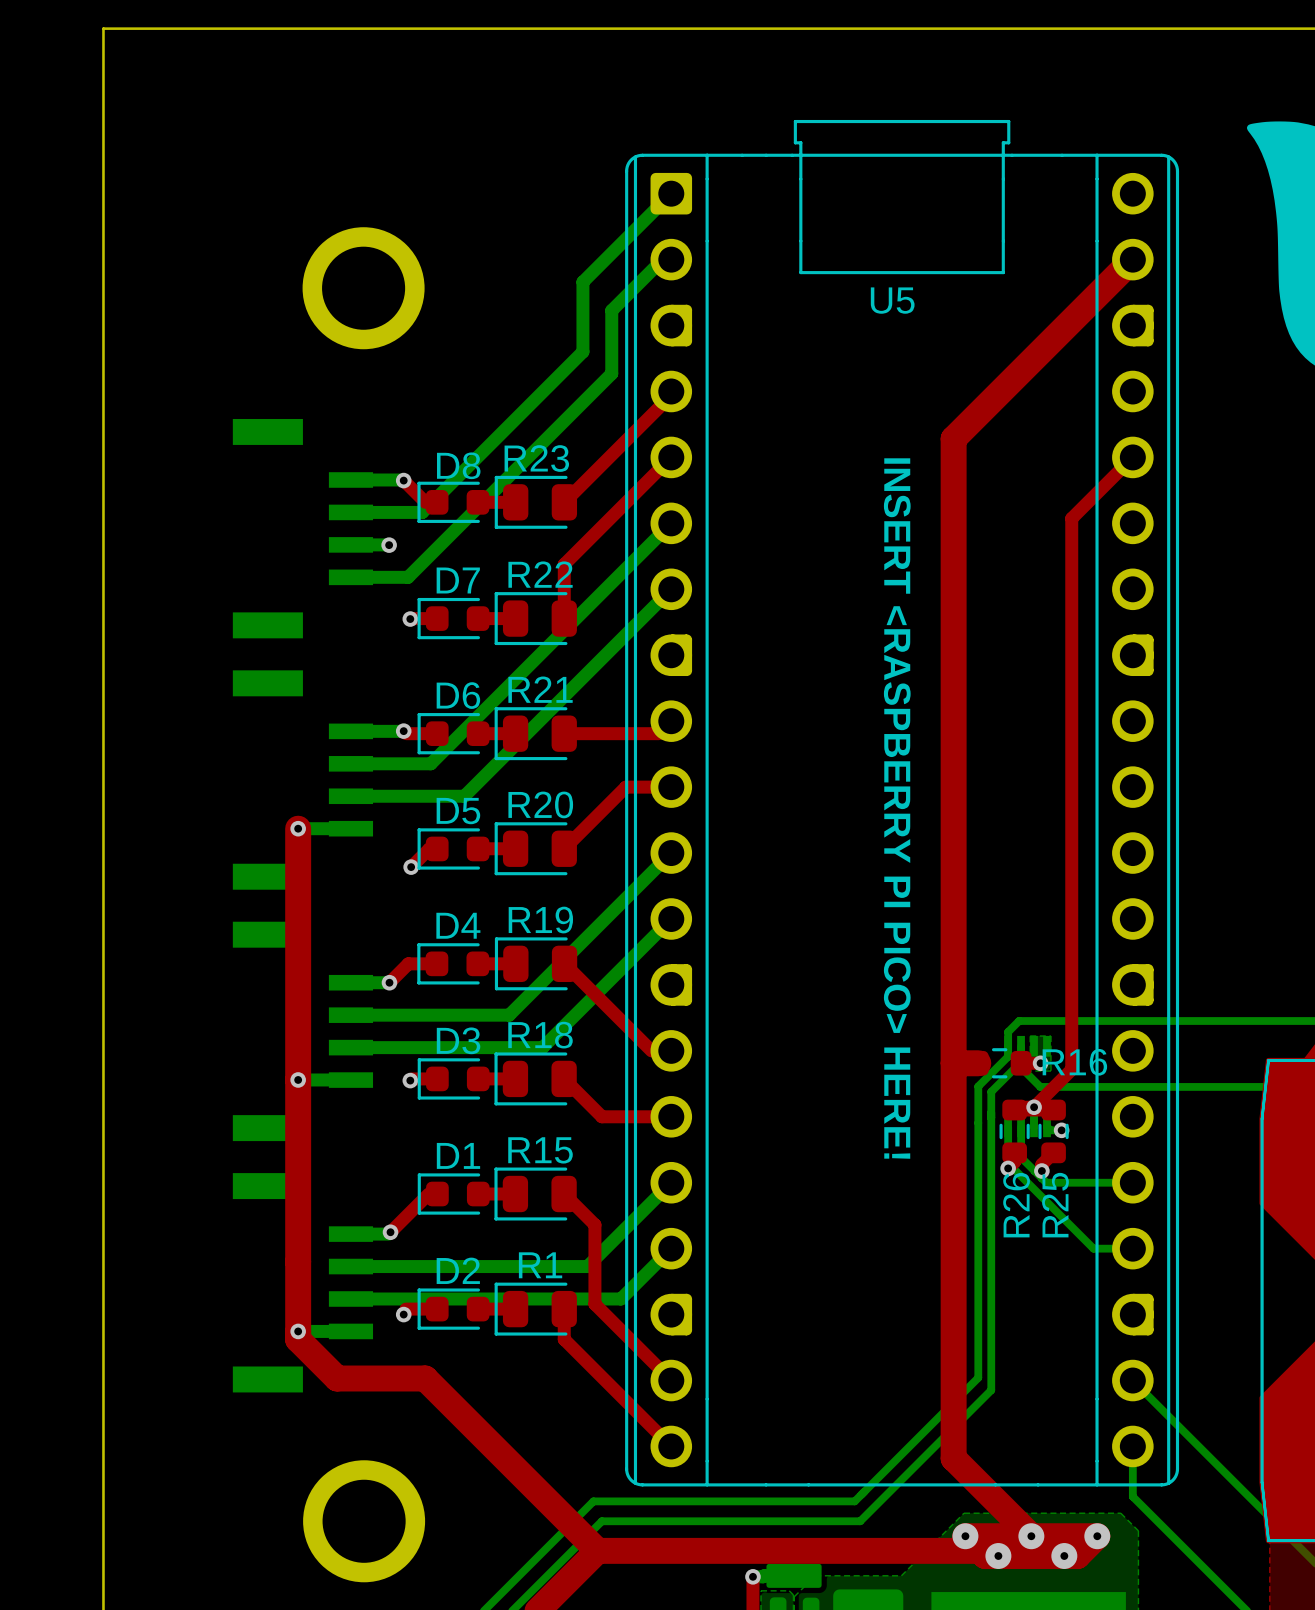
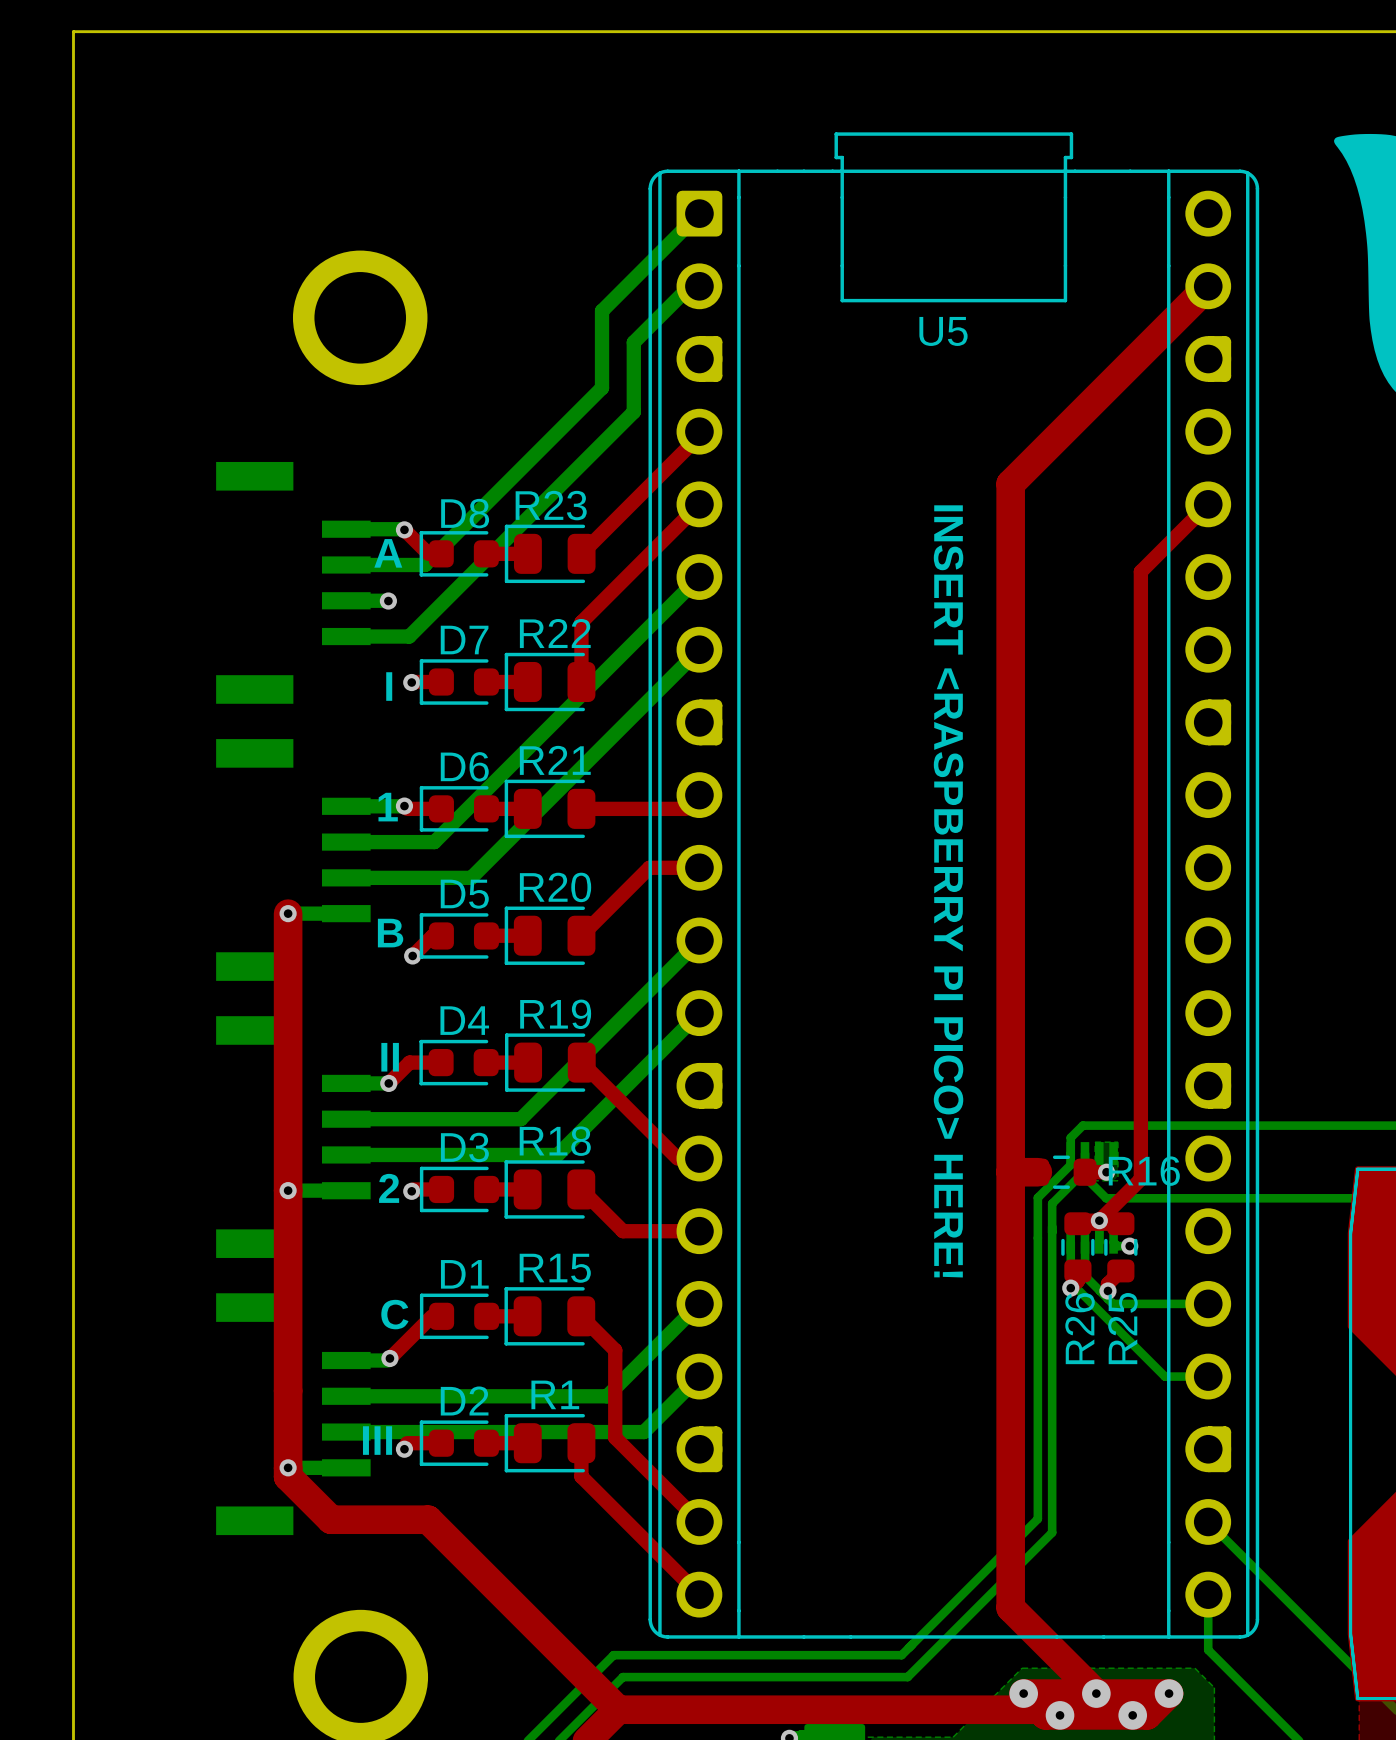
text: none -> A (388, 553)
text: none -> I (389, 686)
text: none -> 1 (388, 807)
text: none -> B (390, 933)
text: none -> II (390, 1057)
text: none -> 2 (389, 1188)
text: none -> C (394, 1314)
text: none -> III (377, 1440)

